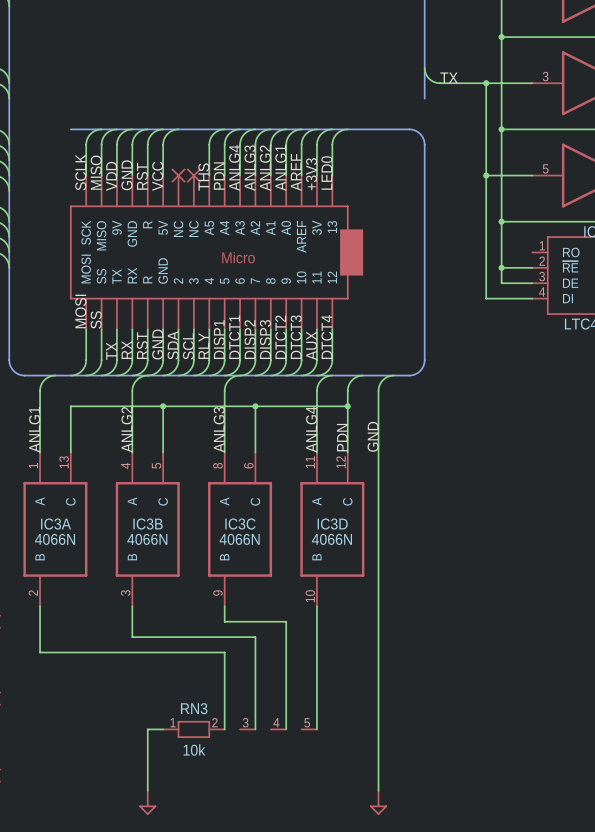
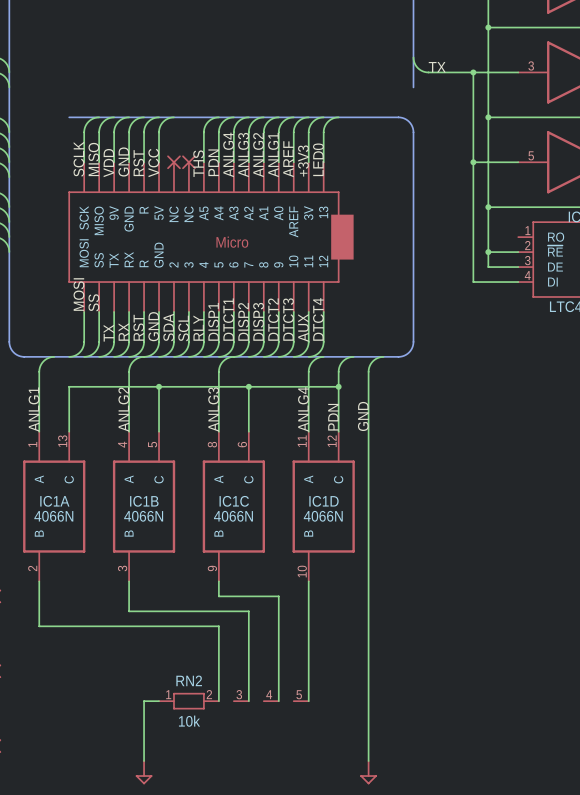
IC3A name: IC3A (56, 524) -> IC1A (54, 501)
IC3B name: IC3B (148, 524) -> IC1B (144, 501)
IC3C name: IC3C (240, 524) -> IC1C (234, 501)
IC3D name: IC3D (332, 524) -> IC1D (323, 501)
RN3 name: RN3 (194, 708) -> RN2 (189, 680)

